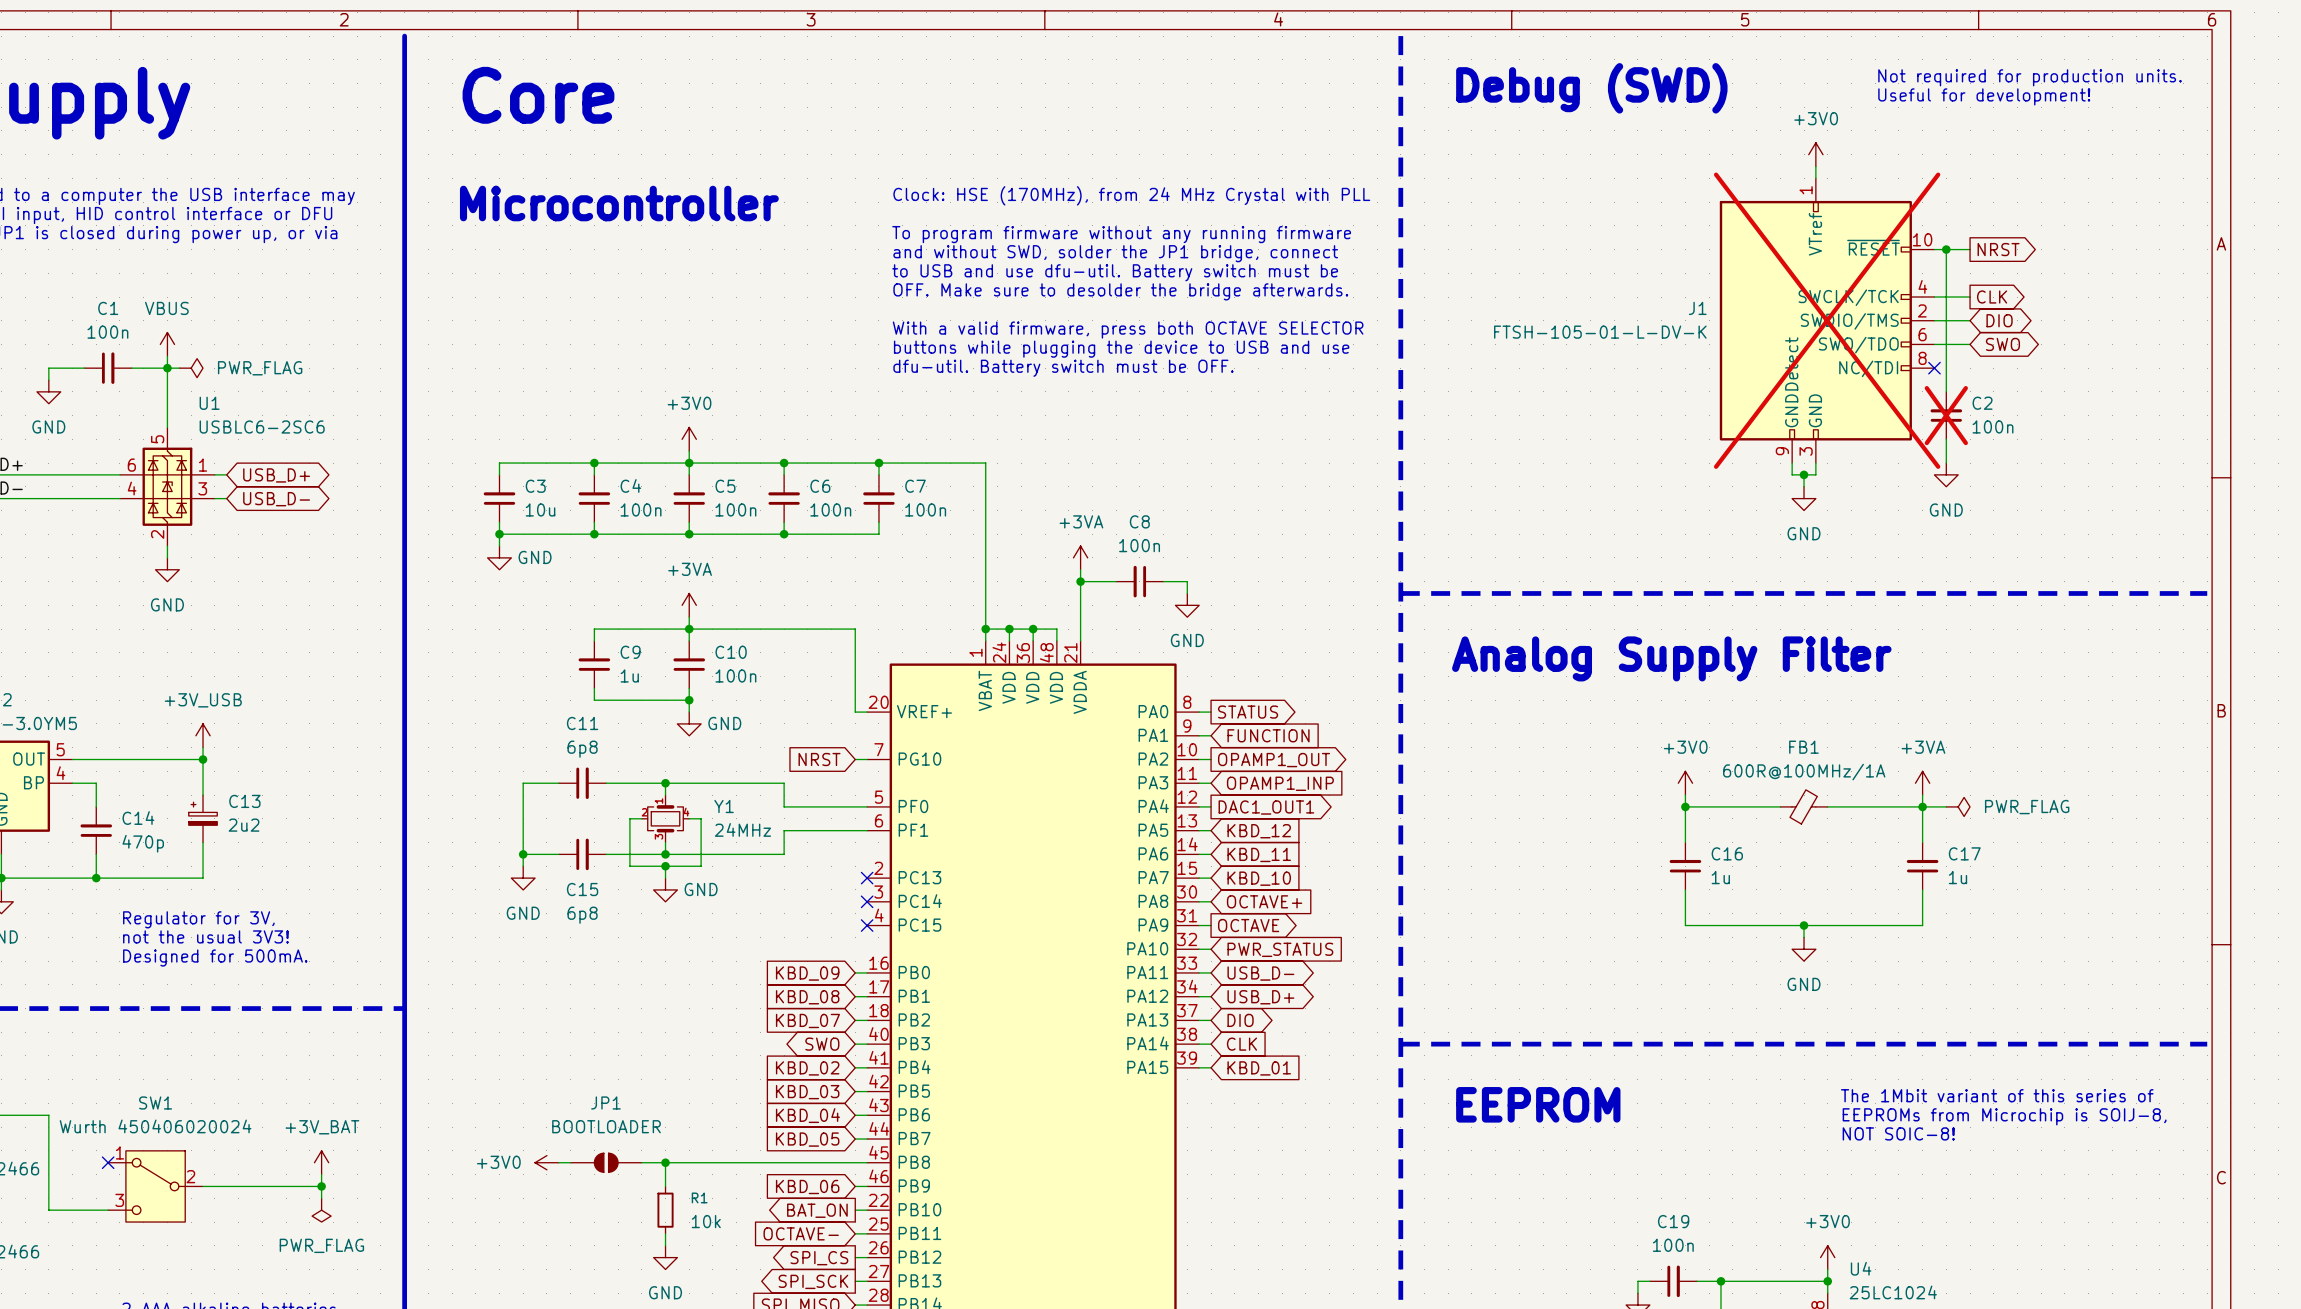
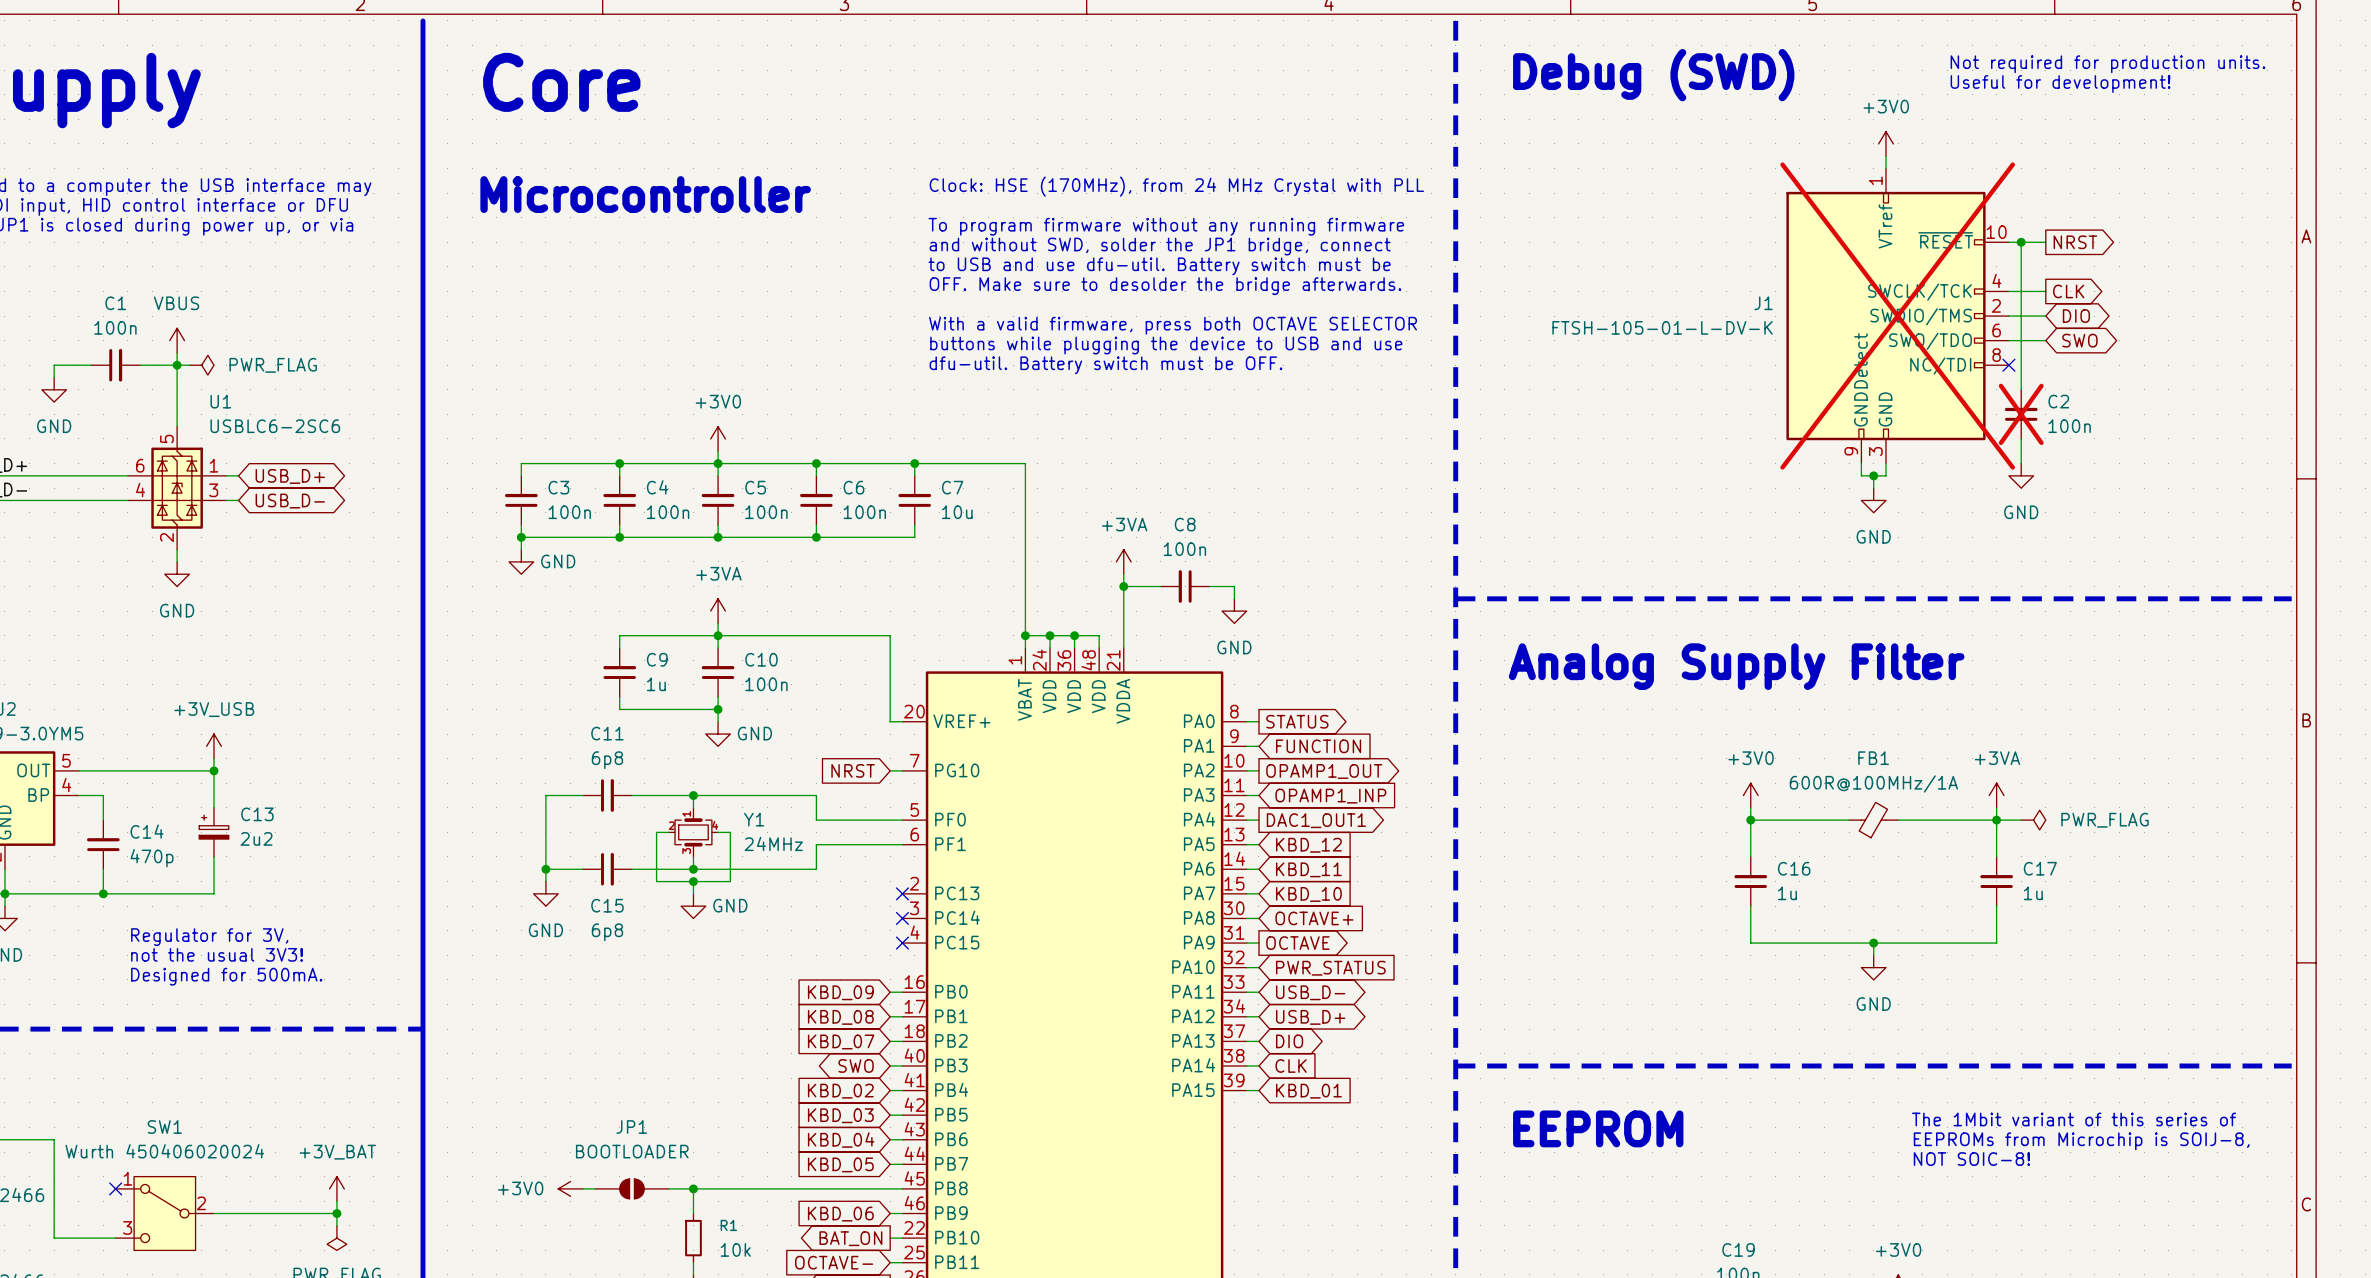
C3 value: 10u (540, 509) -> 100n (569, 512)
C7 value: 100n (925, 509) -> 10u (957, 512)

